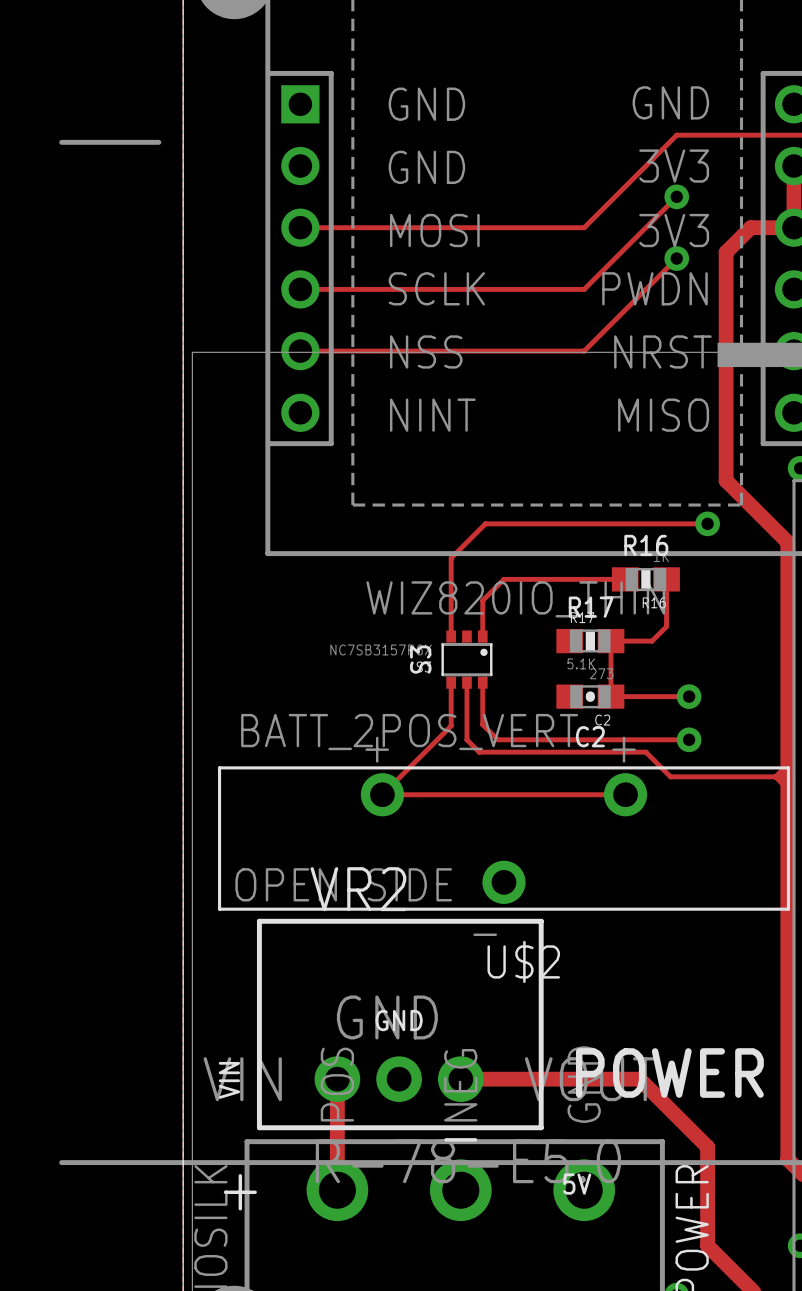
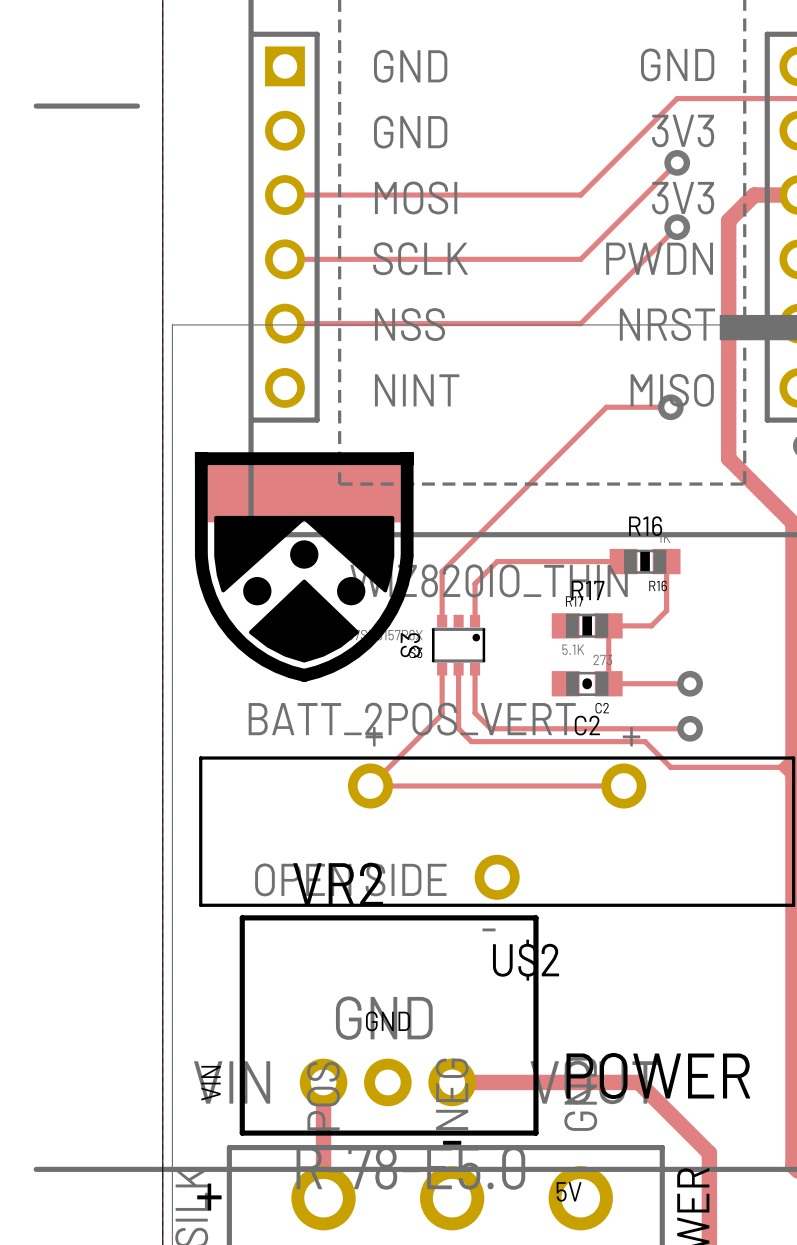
drawing: none -> [194, 452, 414, 682]
track: (707, 523) (485, 523) (451, 558) (451, 589) -> (670, 407) (606, 407) (442, 571)
via position: (707, 523) -> (670, 407)

